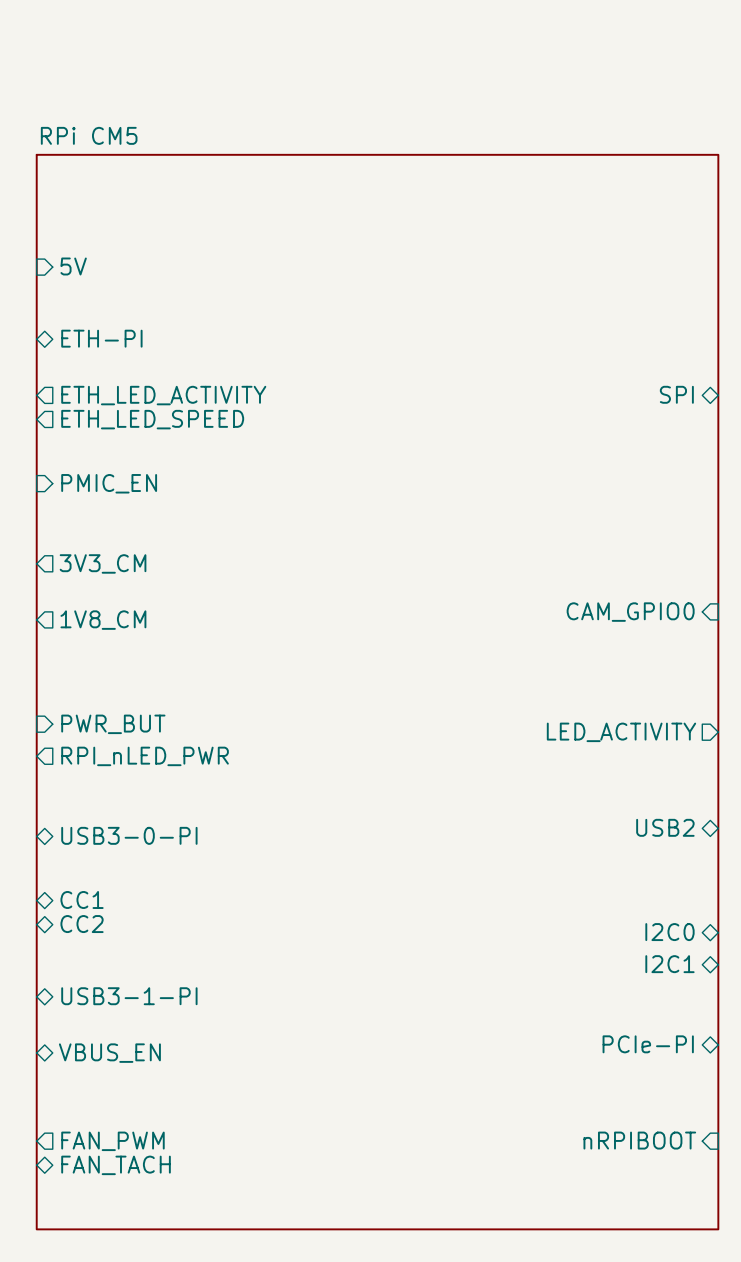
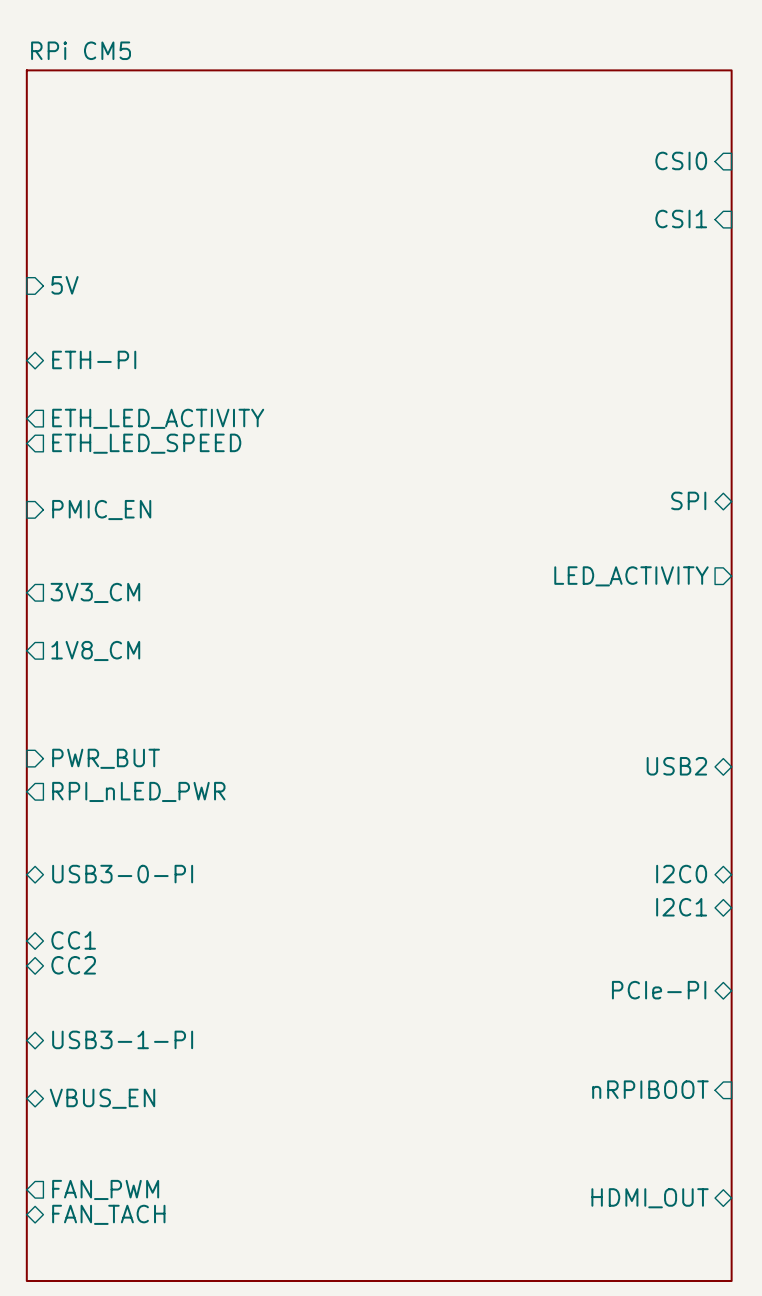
sheet RPi CM5 name position: RPi CM5 (89, 135) -> RPi CM5 (81, 50)
sheet pin: none -> CSI0 (681, 160)
sheet RPi CM5 shape: [35, 153, 720, 1231] -> [25, 69, 733, 1282]
sheet pin: none -> CSI1 (681, 219)
sheet pin position: SPI (676, 394) -> SPI (688, 500)
sheet pin: none -> LED_ACTIVITY (631, 576)
sheet pin: CAM_GPIO0 (630, 612) -> none
sheet pin shape: output (621, 732) -> bidirectional (676, 766)
sheet pin: LED_ACTIVITY (621, 732) -> USB2 (676, 766)
sheet pin: USB2 (665, 827) -> none
sheet pin position: I2C0 (669, 932) -> I2C0 (681, 874)
sheet pin: none -> PCIe-PI (659, 990)
sheet pin position: I2C1 (669, 964) -> I2C1 (681, 907)
sheet pin shape: bidirectional (648, 1044) -> input (650, 1089)
sheet pin: PCIe-PI (648, 1044) -> nRPIBOOT (650, 1089)
sheet pin shape: input (639, 1140) -> bidirectional (650, 1198)
sheet pin: nRPIBOOT (639, 1140) -> HDMI_OUT (650, 1198)

